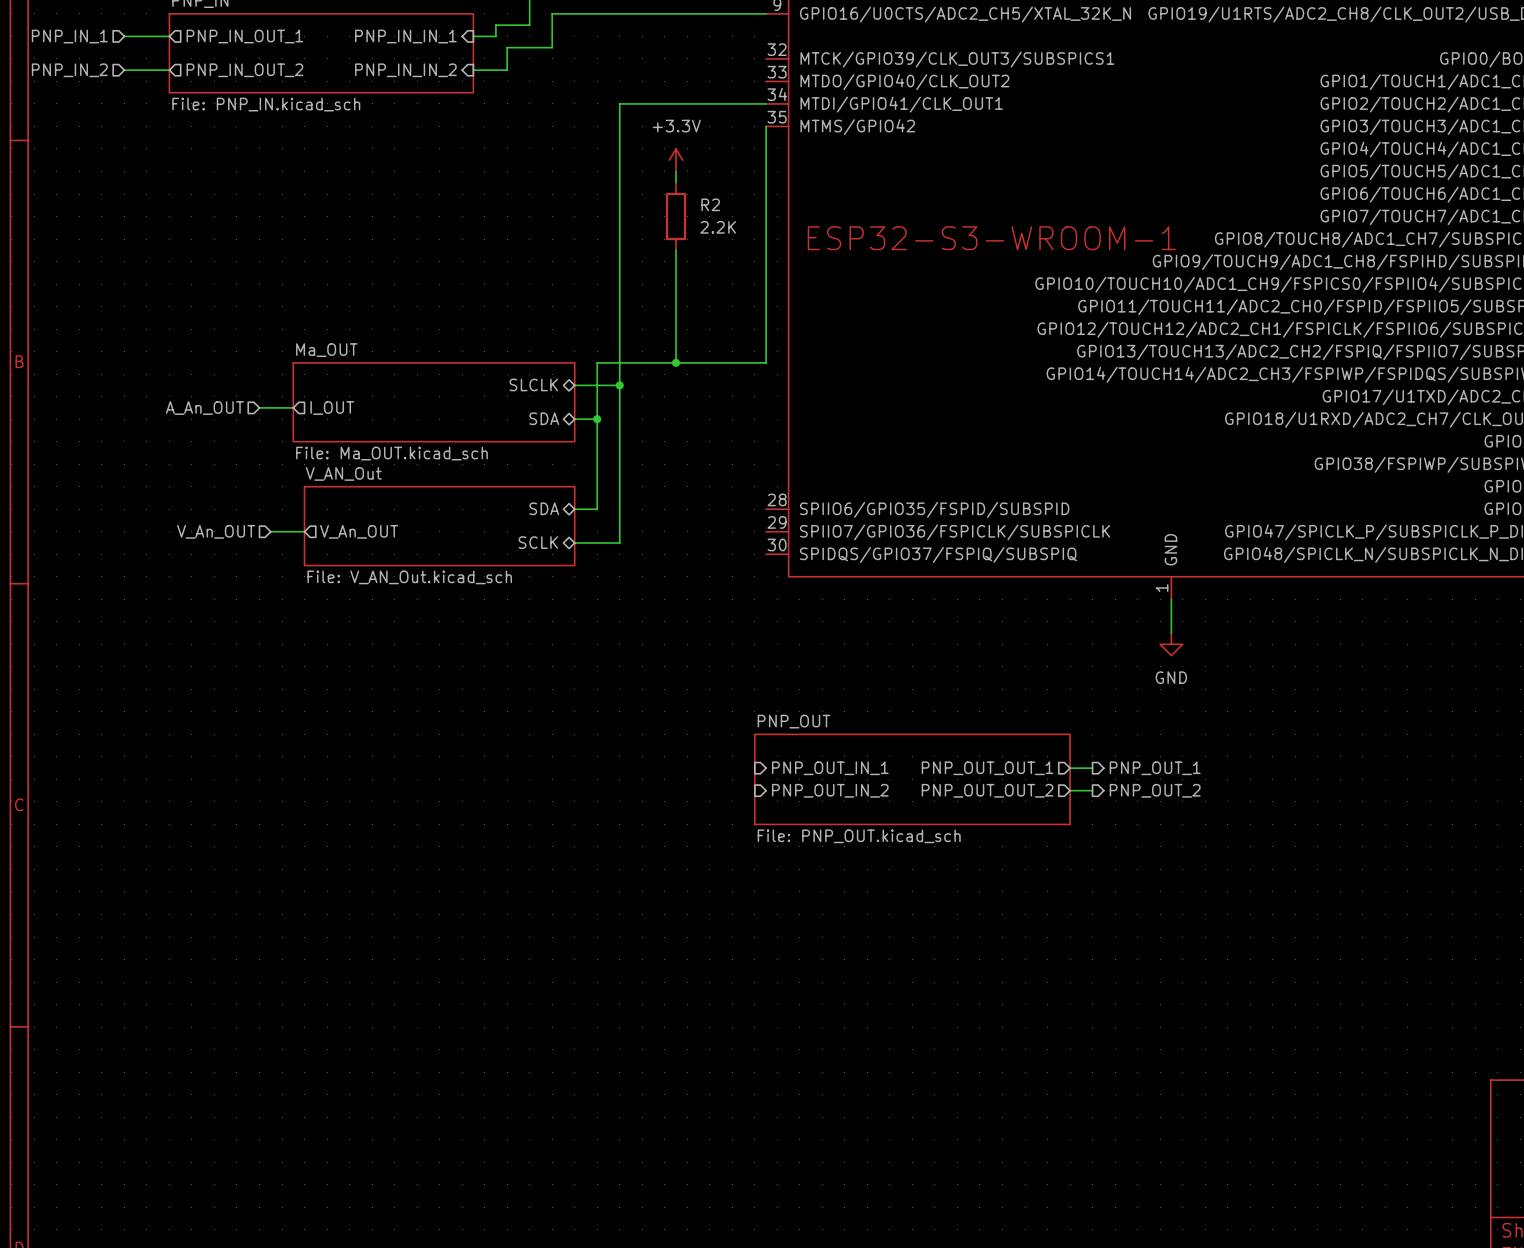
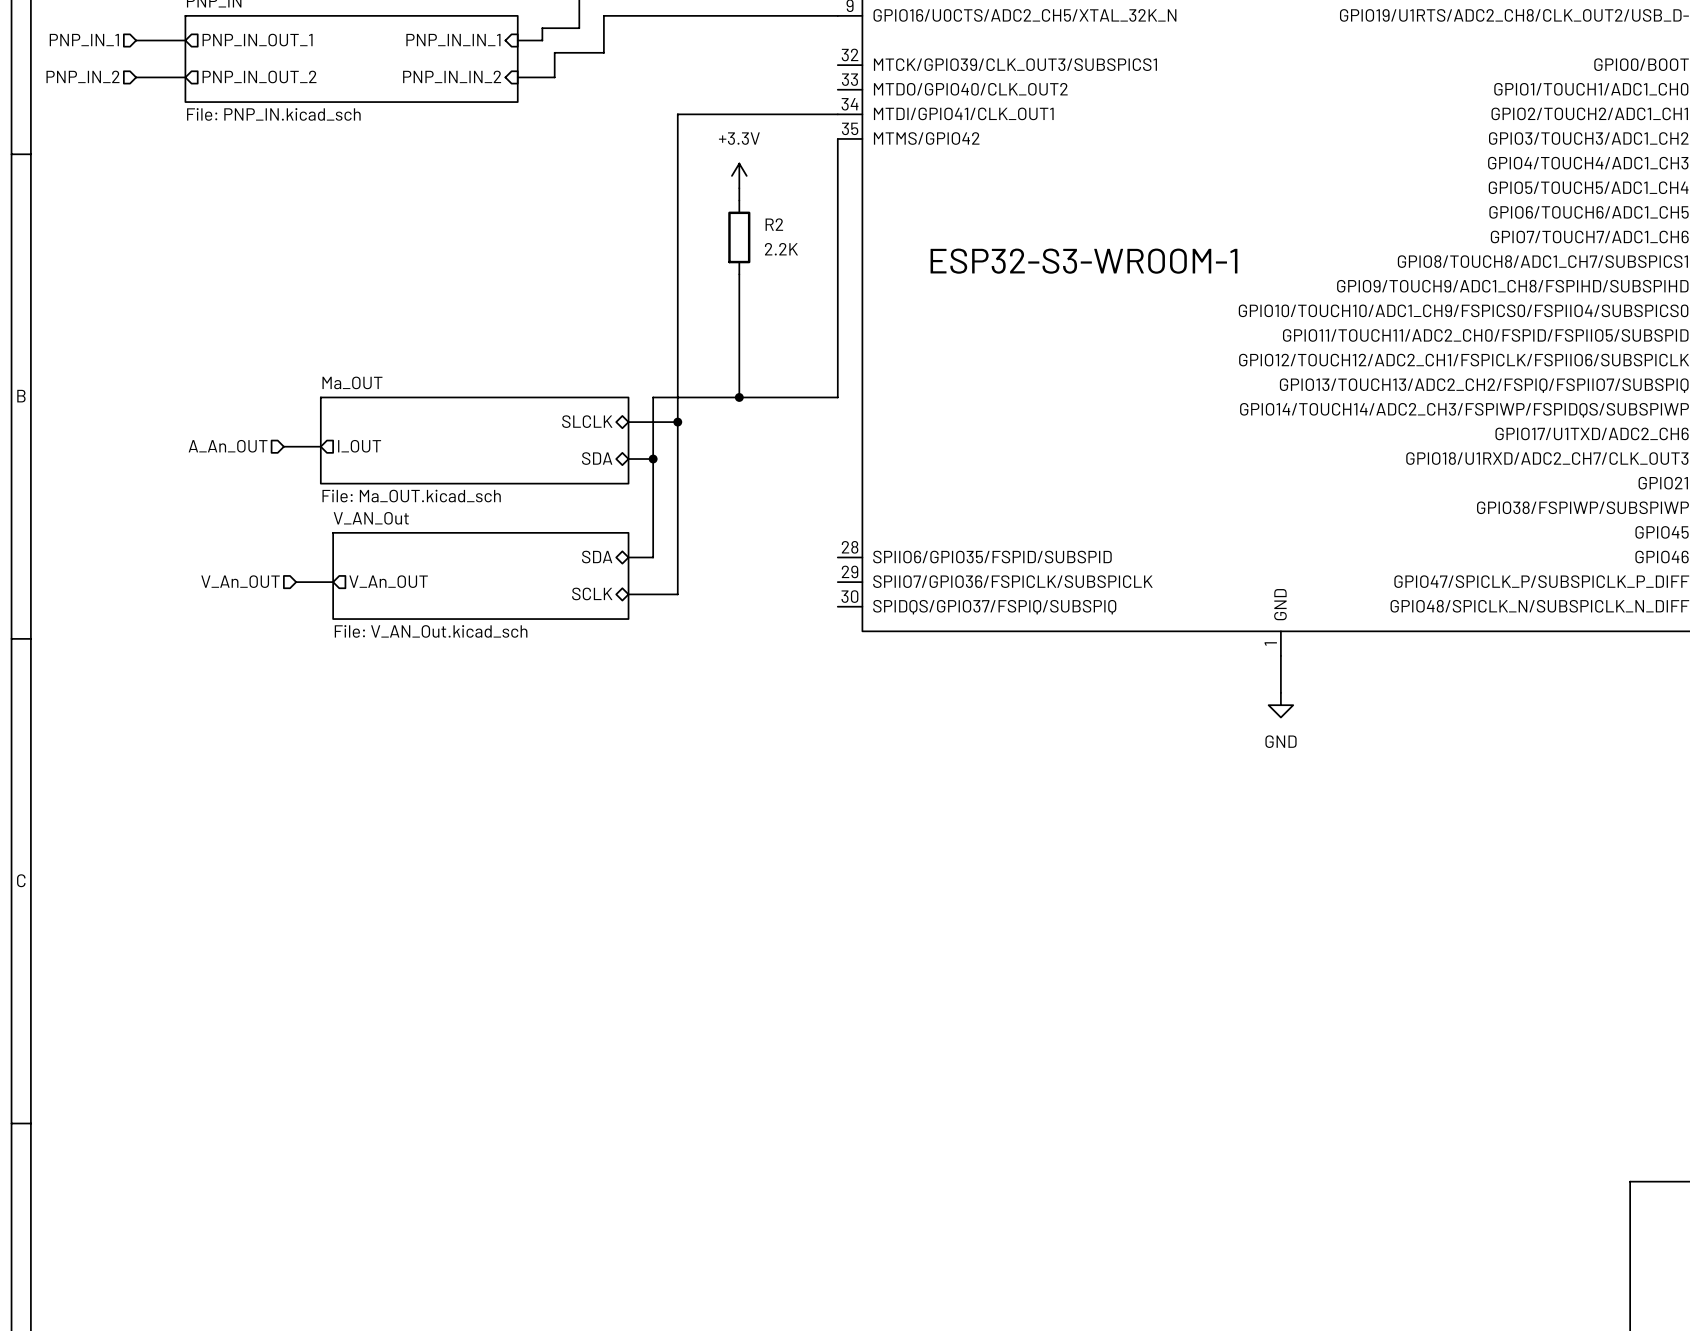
sheet pin: PNP_OUT_IN_1 (830, 768) -> none
sheet pin: PNP_OUT_OUT_1 (987, 768) -> none
wire: (1070, 768) (1092, 768) -> none
hierarchical label: PNP_OUT_1 (1155, 768) -> none
sheet PNP_OUT: File: PNP_OUT.kicad_sch (912, 779) -> none
sheet pin: PNP_OUT_IN_2 (830, 790) -> none
sheet pin: PNP_OUT_OUT_2 (987, 790) -> none
wire: (1070, 790) (1092, 790) -> none
hierarchical label: PNP_OUT_2 (1155, 790) -> none

